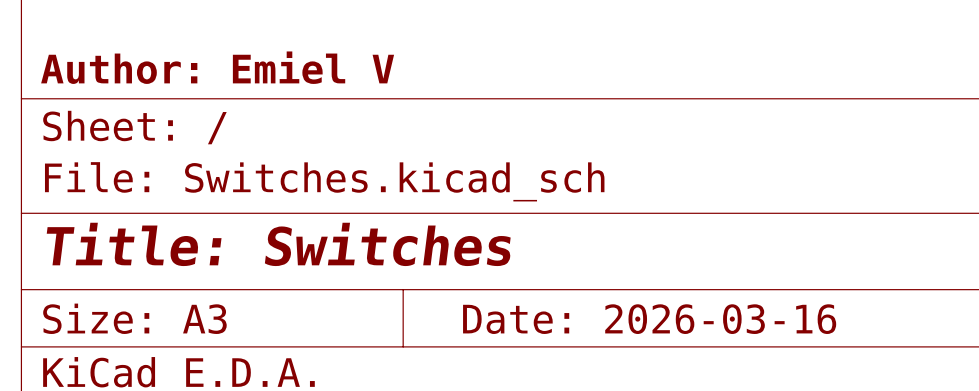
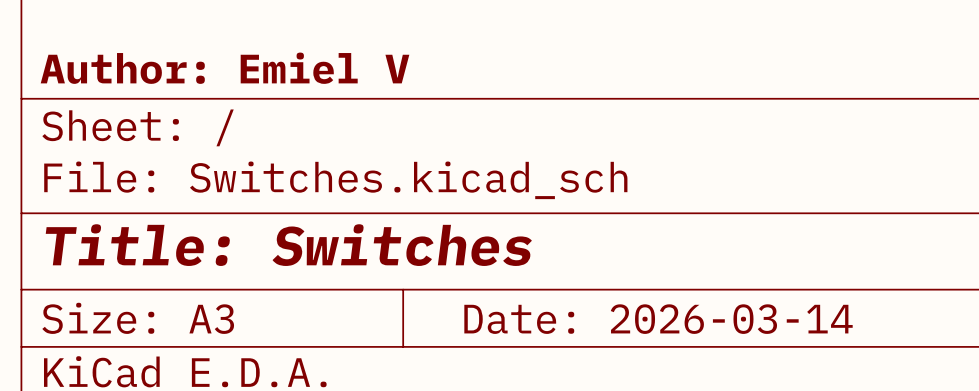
title block: Date: 2026-03-16 (649, 319) -> Date: 2026-03-14 (658, 319)

